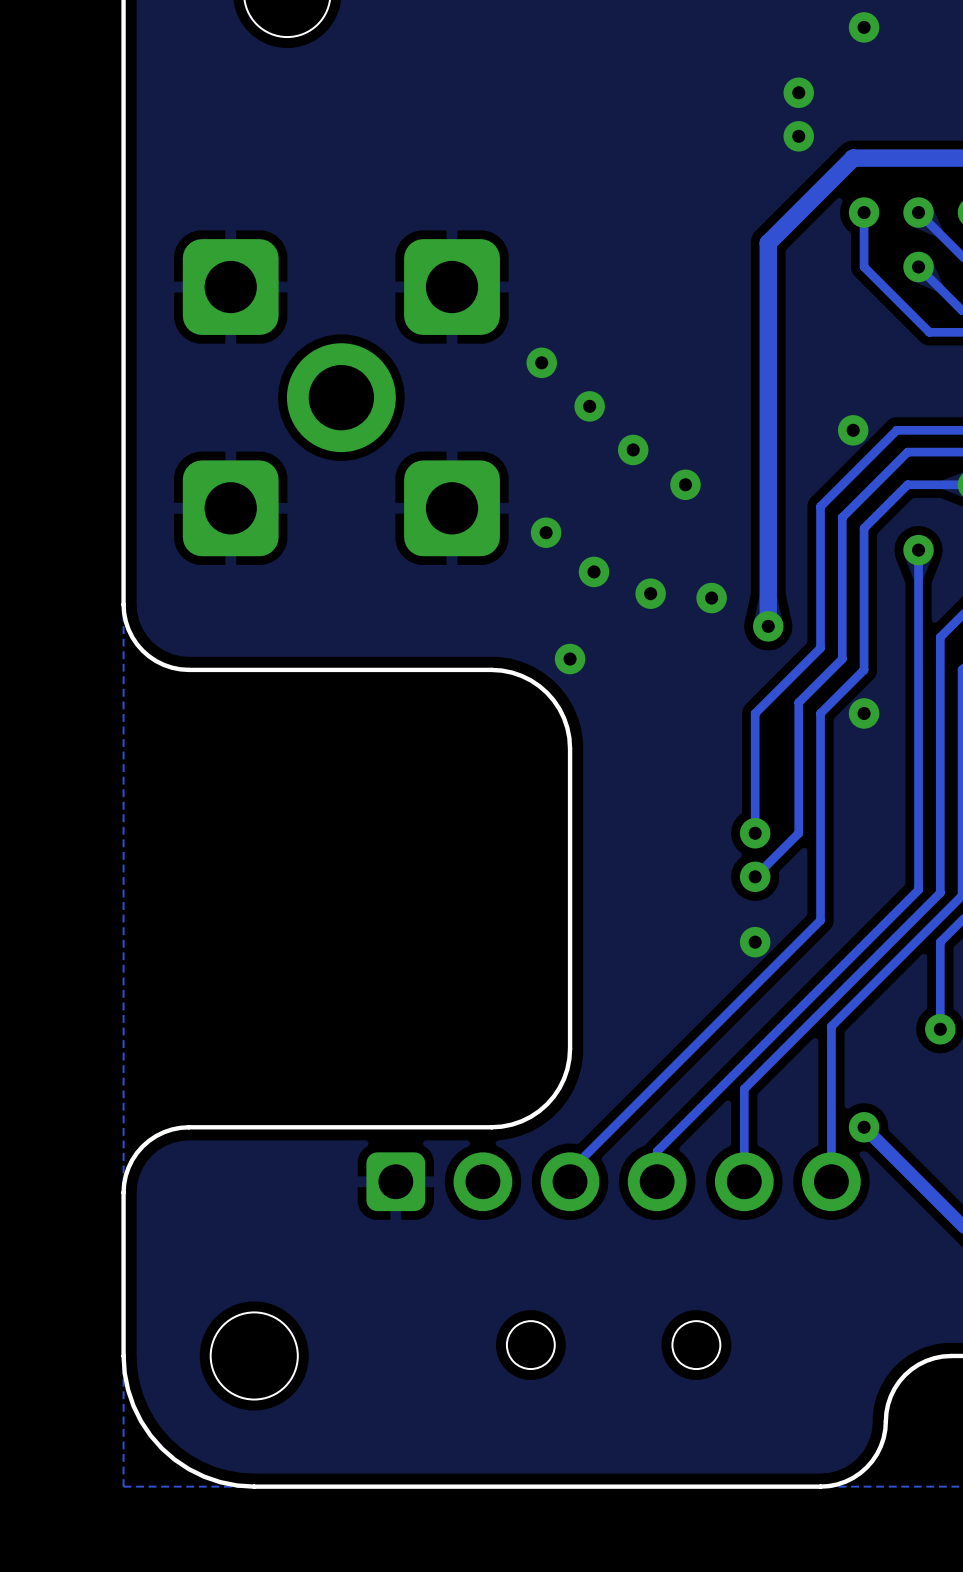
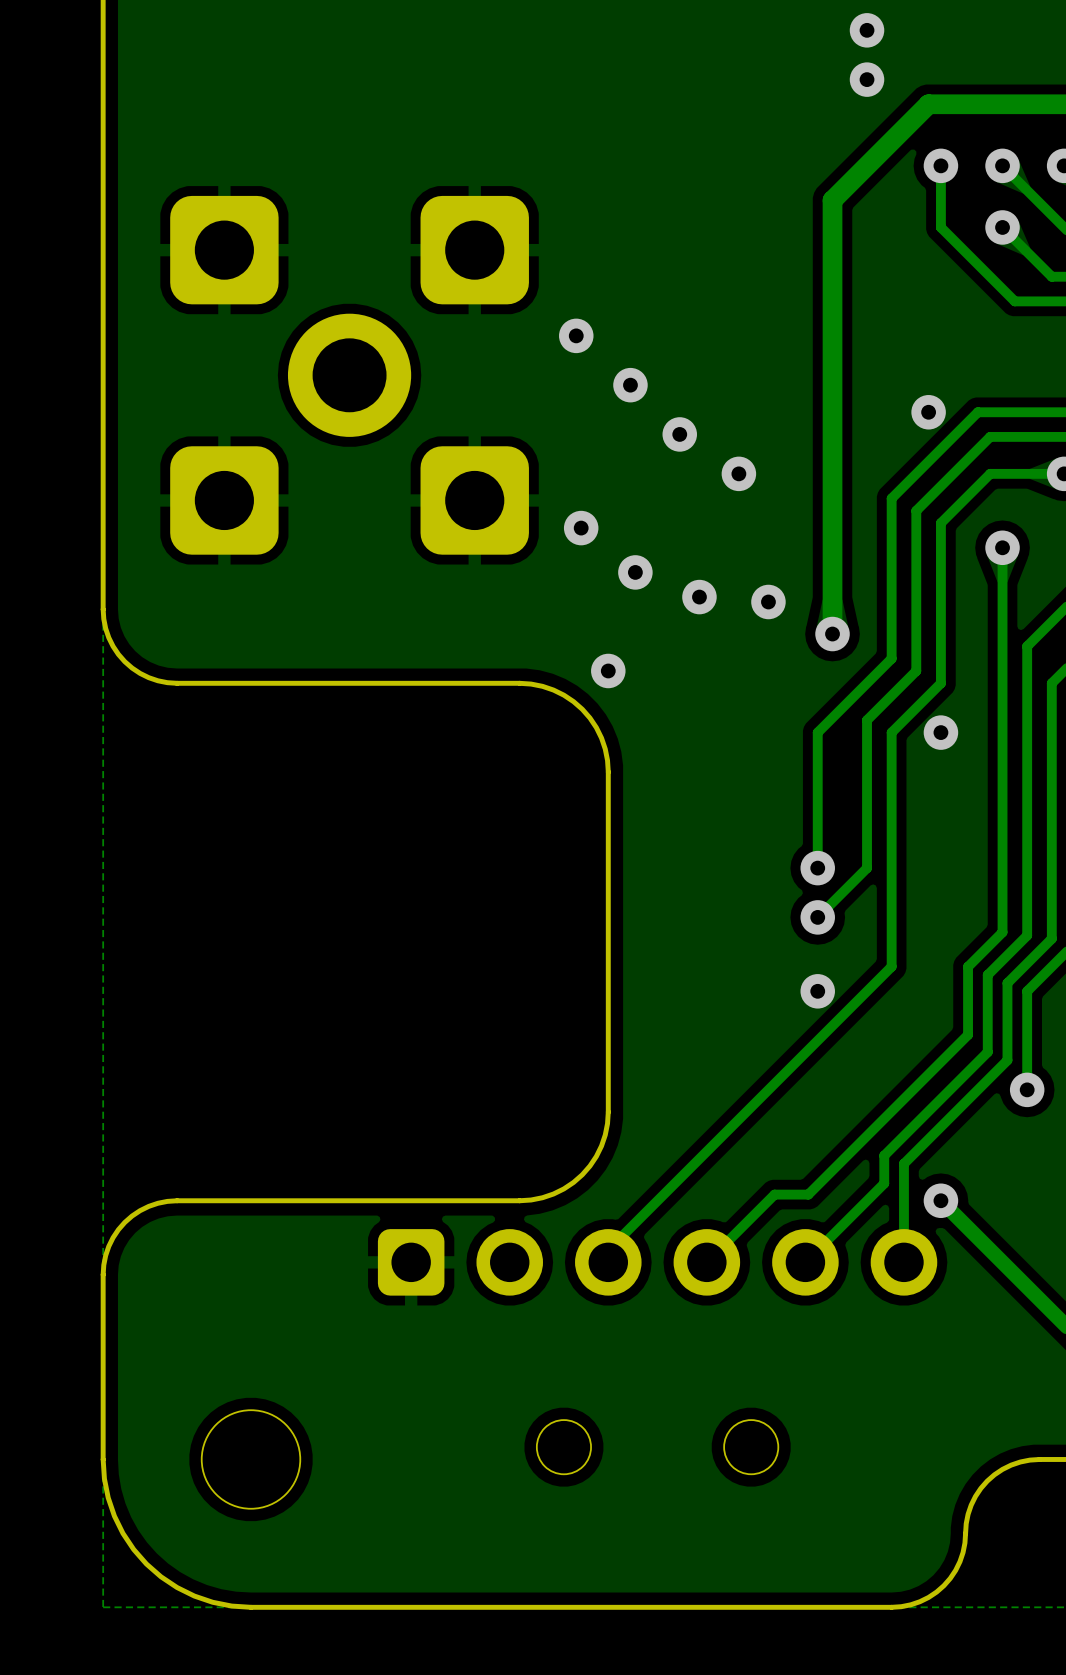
track: (888, 920) (657, 1151) (657, 1181) -> (968, 966) (968, 1034) (808, 1194) (774, 1194) (706, 1262)
track: (905, 927) (744, 1088) (744, 1181) -> (987, 974) (987, 1052) (884, 1155) (884, 1183) (805, 1262)
track: (922, 934) (831, 1026) (831, 1094) -> (1007, 983) (1007, 1060) (903, 1163)

